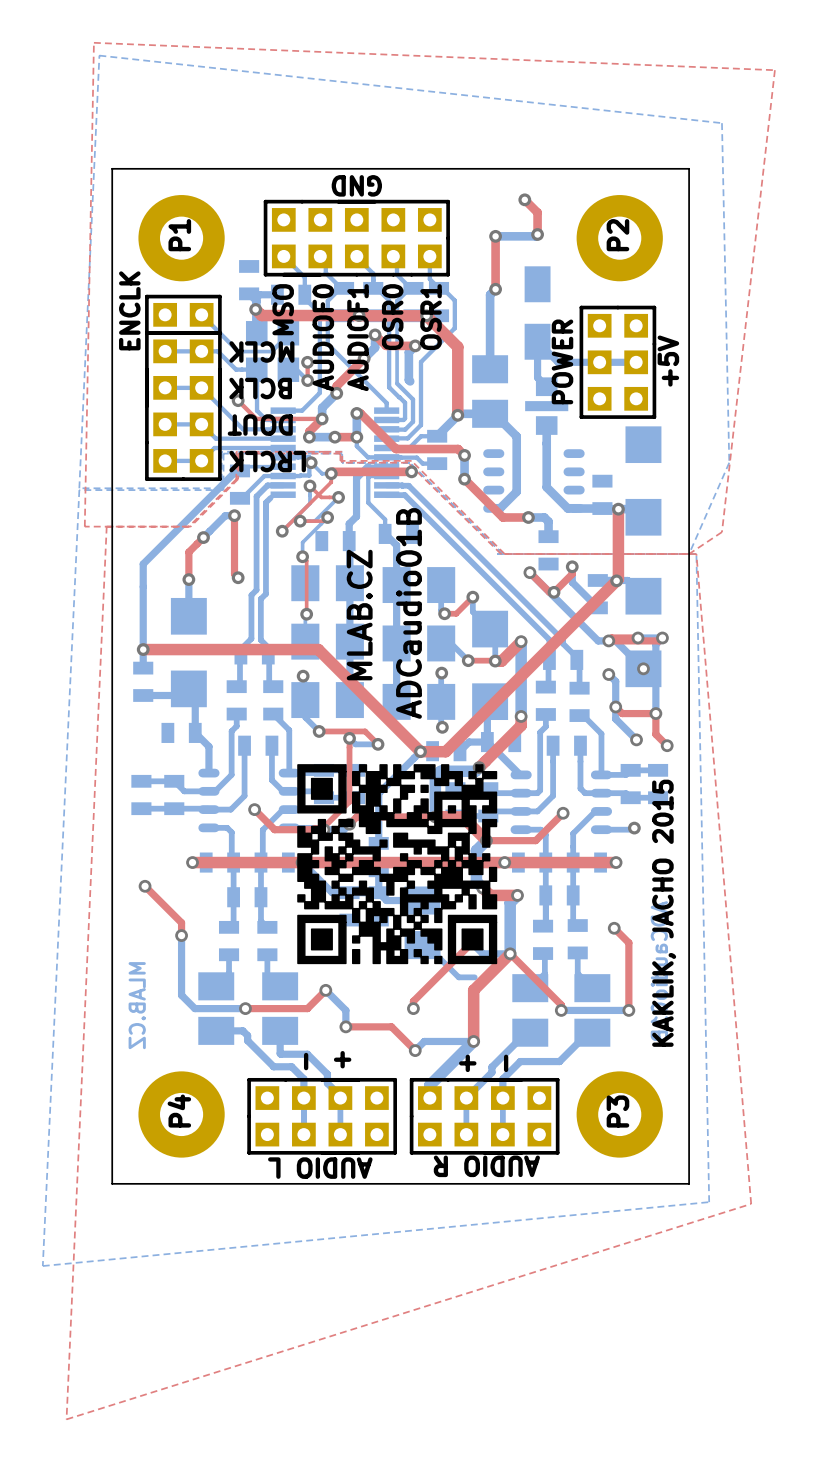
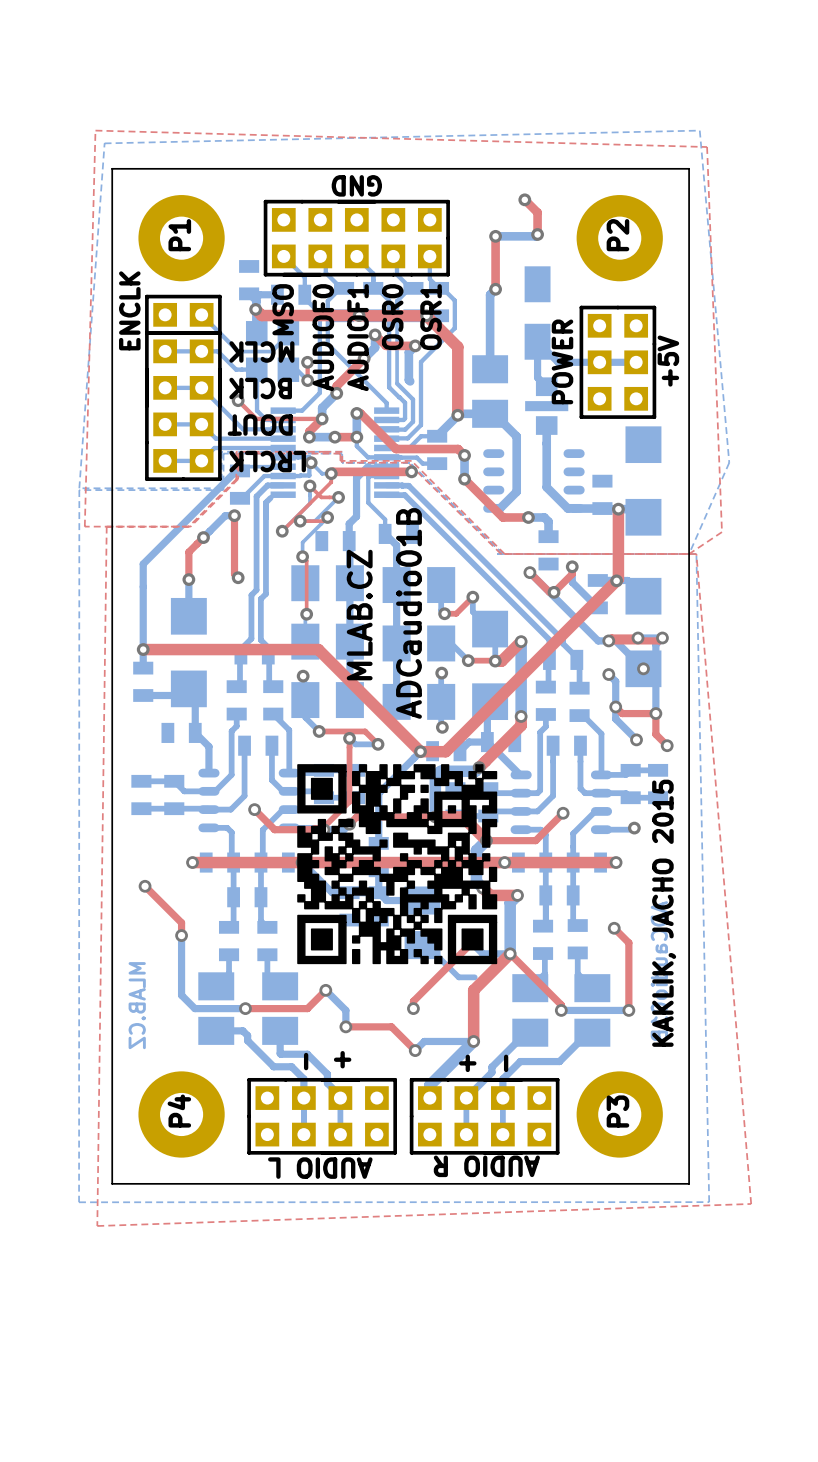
bottom zone outline: (729, 462) (721, 123) (99, 55) (79, 488) -> (729, 462) (699, 130) (104, 143) (79, 488)
bottom zone outline: (79, 490) (42, 1266) (709, 1202) -> (79, 490) (79, 1202) (709, 1202)
top zone outline: (84, 526) (93, 42) (774, 70) (721, 532) -> (84, 526) (95, 130) (707, 147) (721, 532)
top zone outline: (106, 526) (66, 1419) (751, 1203) -> (106, 526) (97, 1226) (751, 1203)

